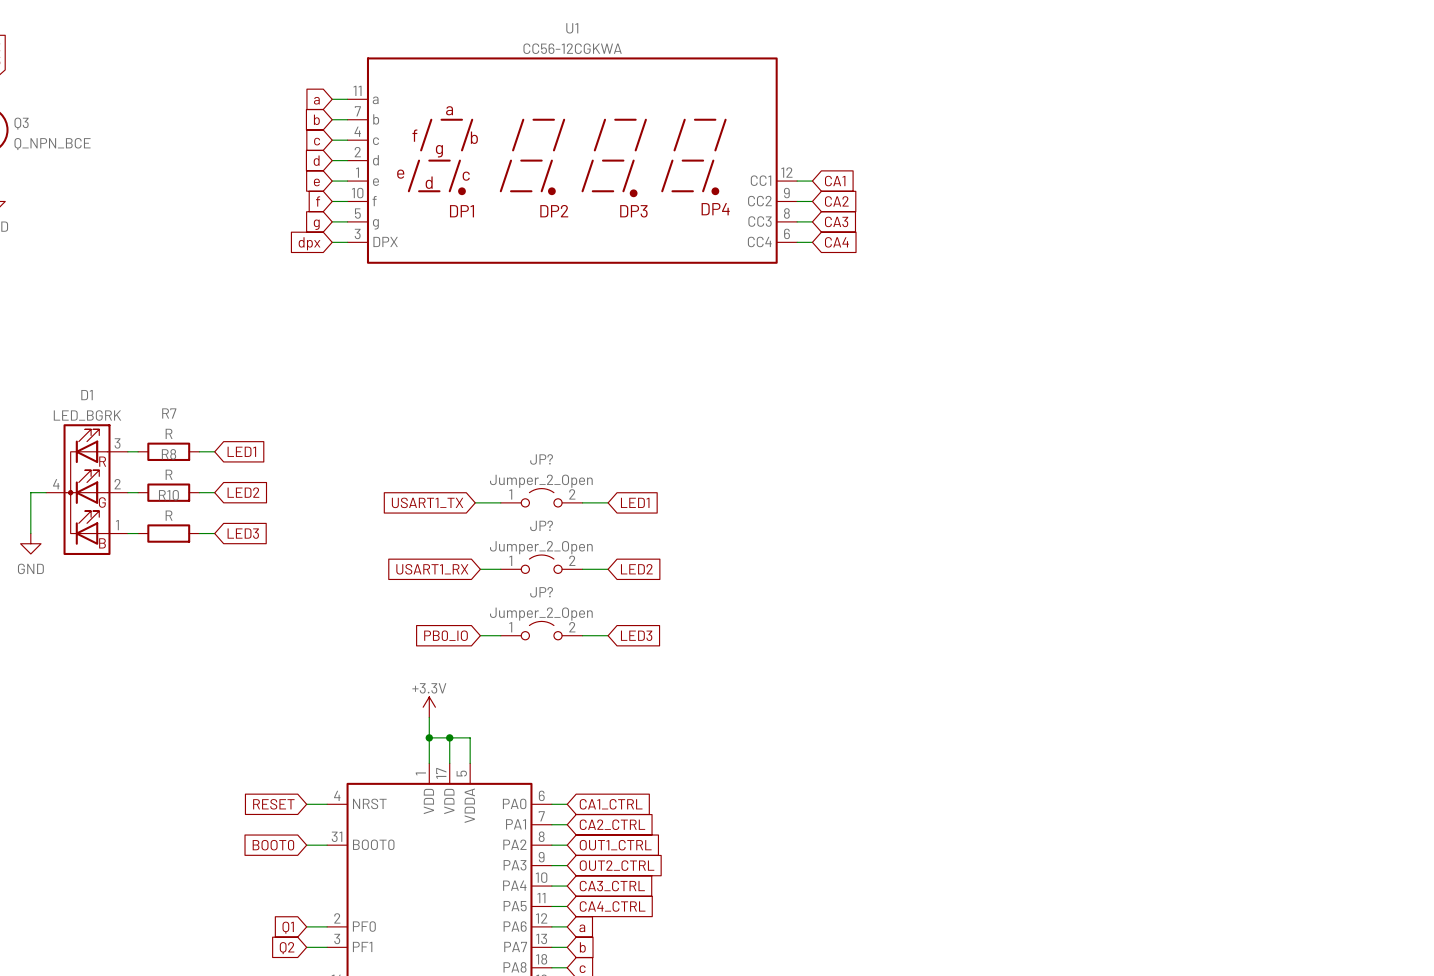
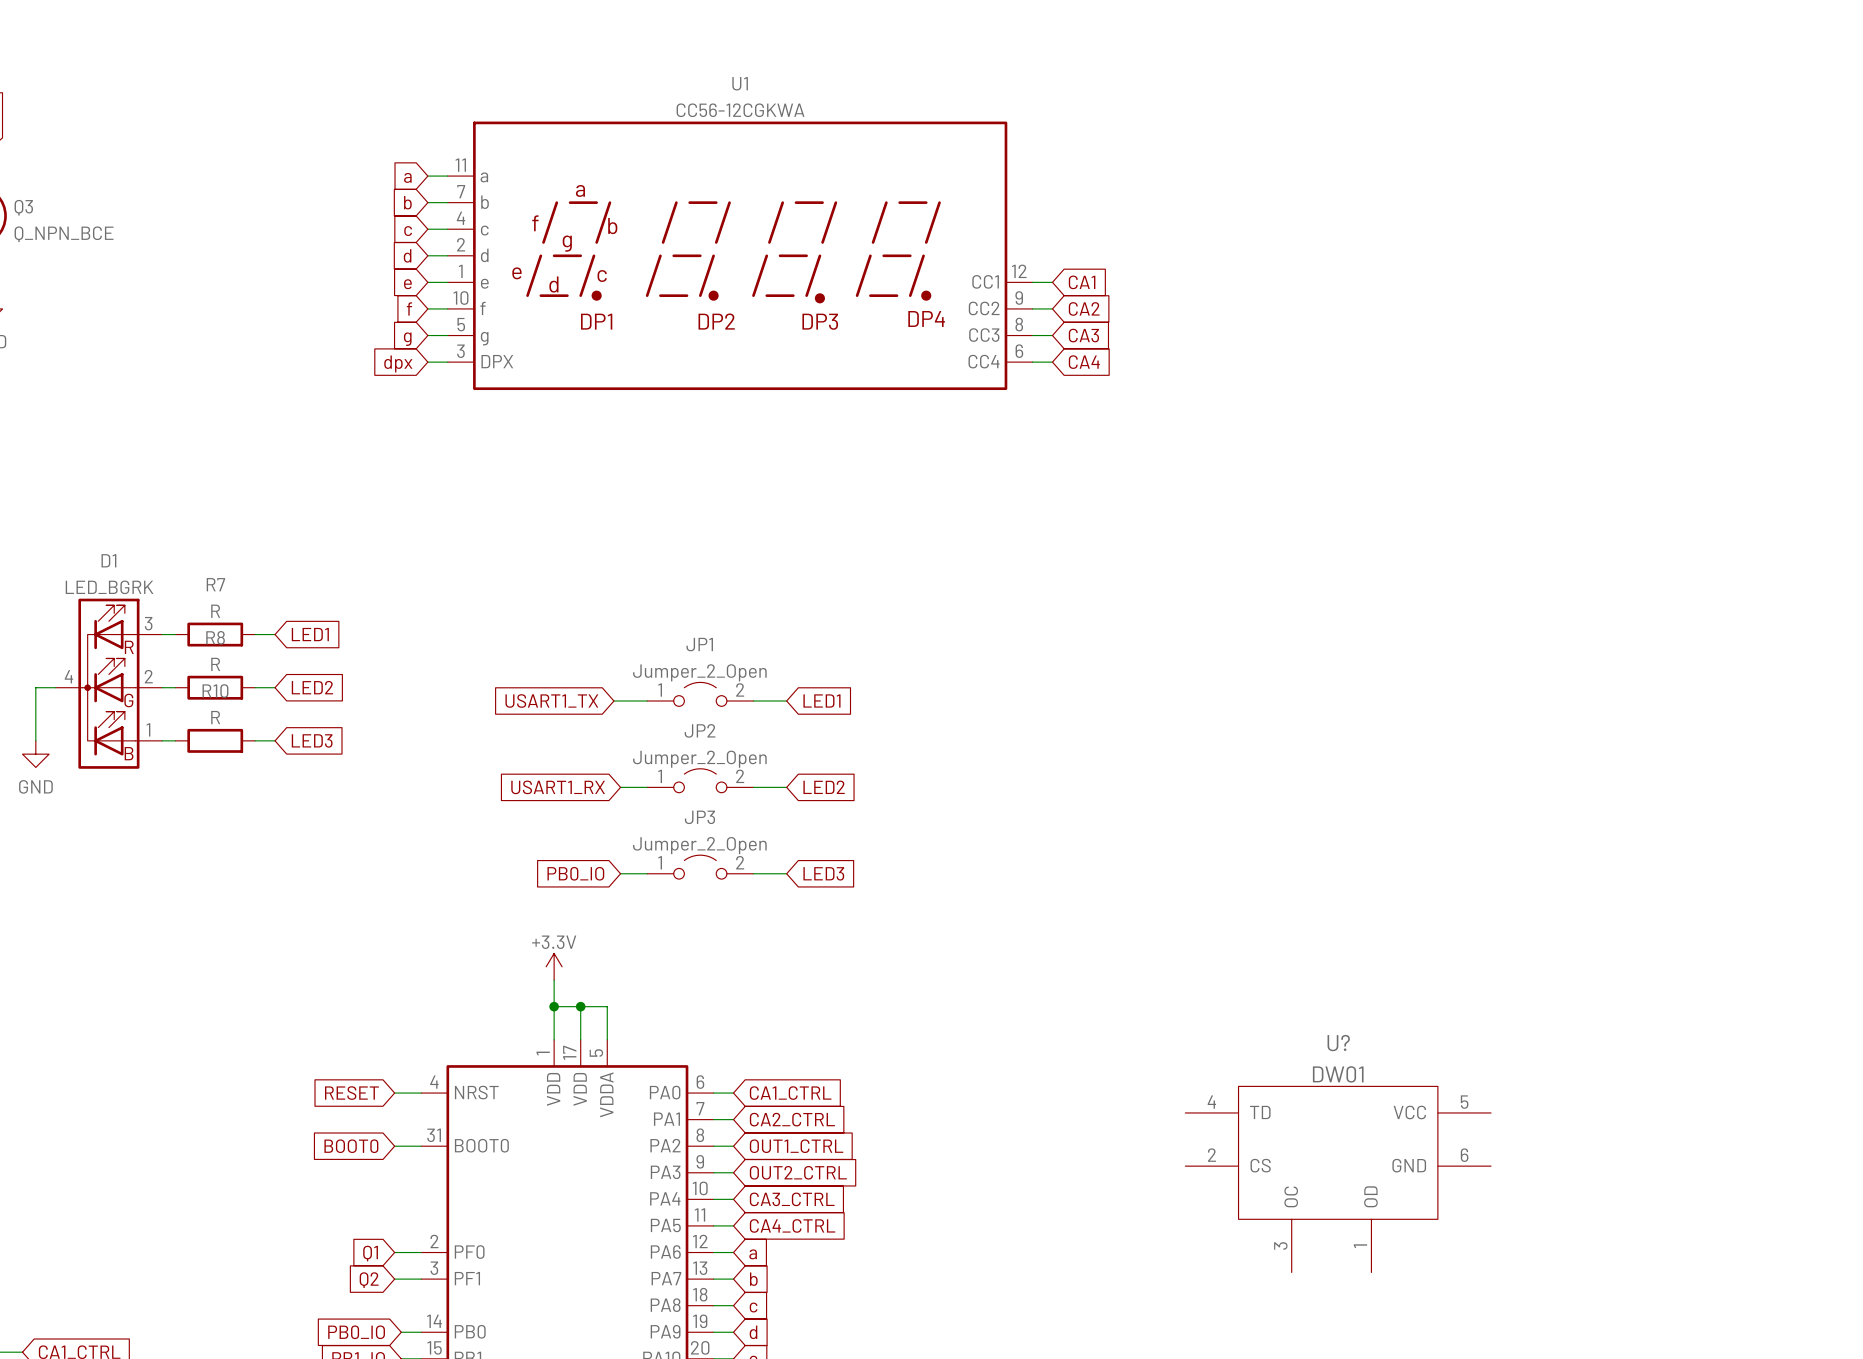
JP? name: JP? (541, 459) -> JP1 (699, 644)
JP? name: JP? (541, 525) -> JP2 (700, 730)
JP? name: JP? (541, 592) -> JP3 (699, 817)
U?: none -> DW01 (1338, 1179)

